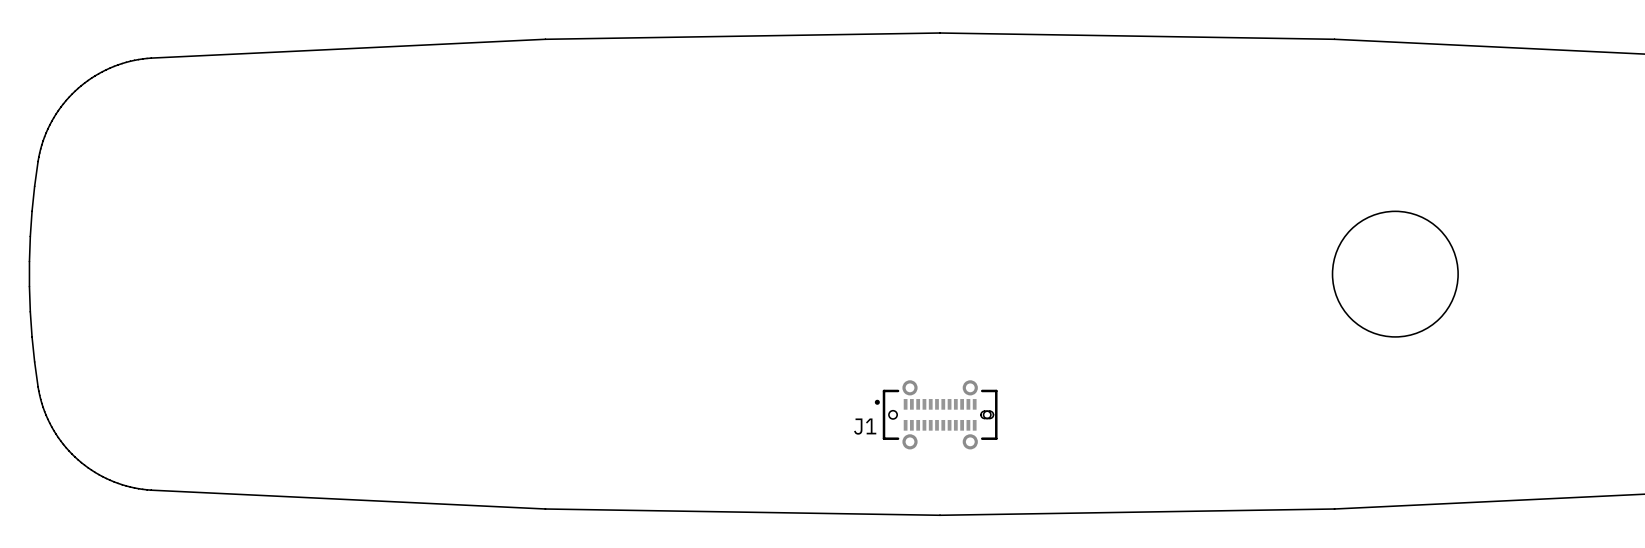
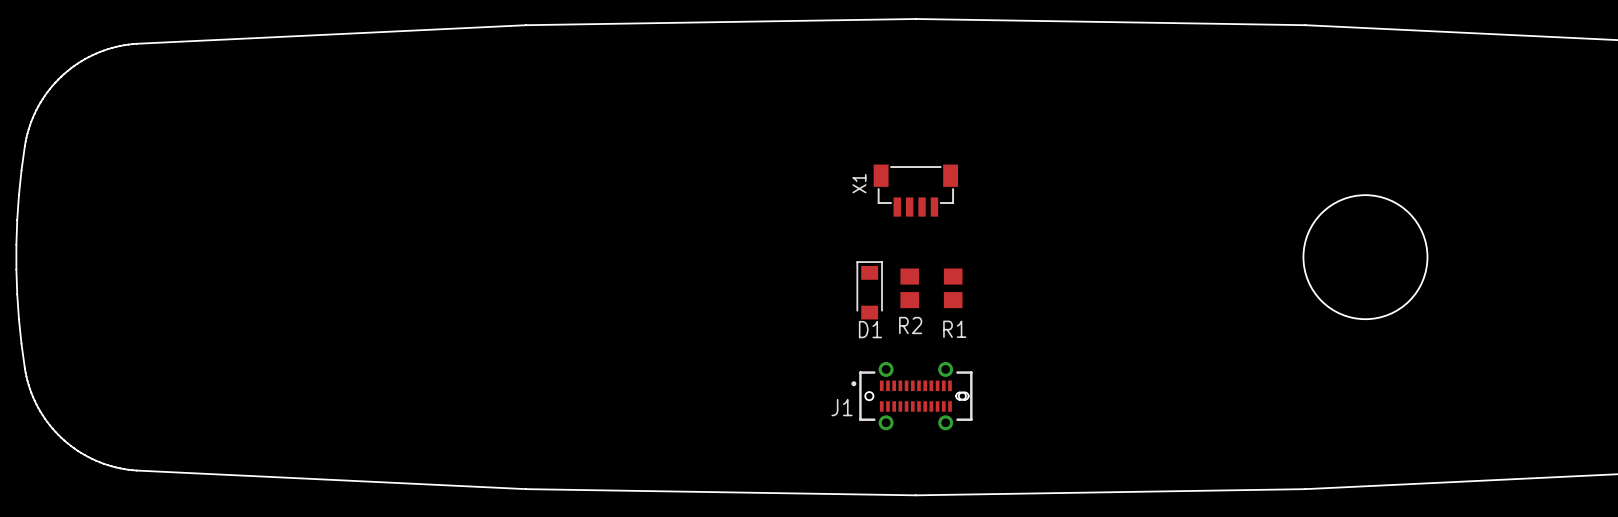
X1: none -> (915, 190)
R2: none -> (909, 288)
R1: none -> (953, 288)
D1: none -> (869, 290)

